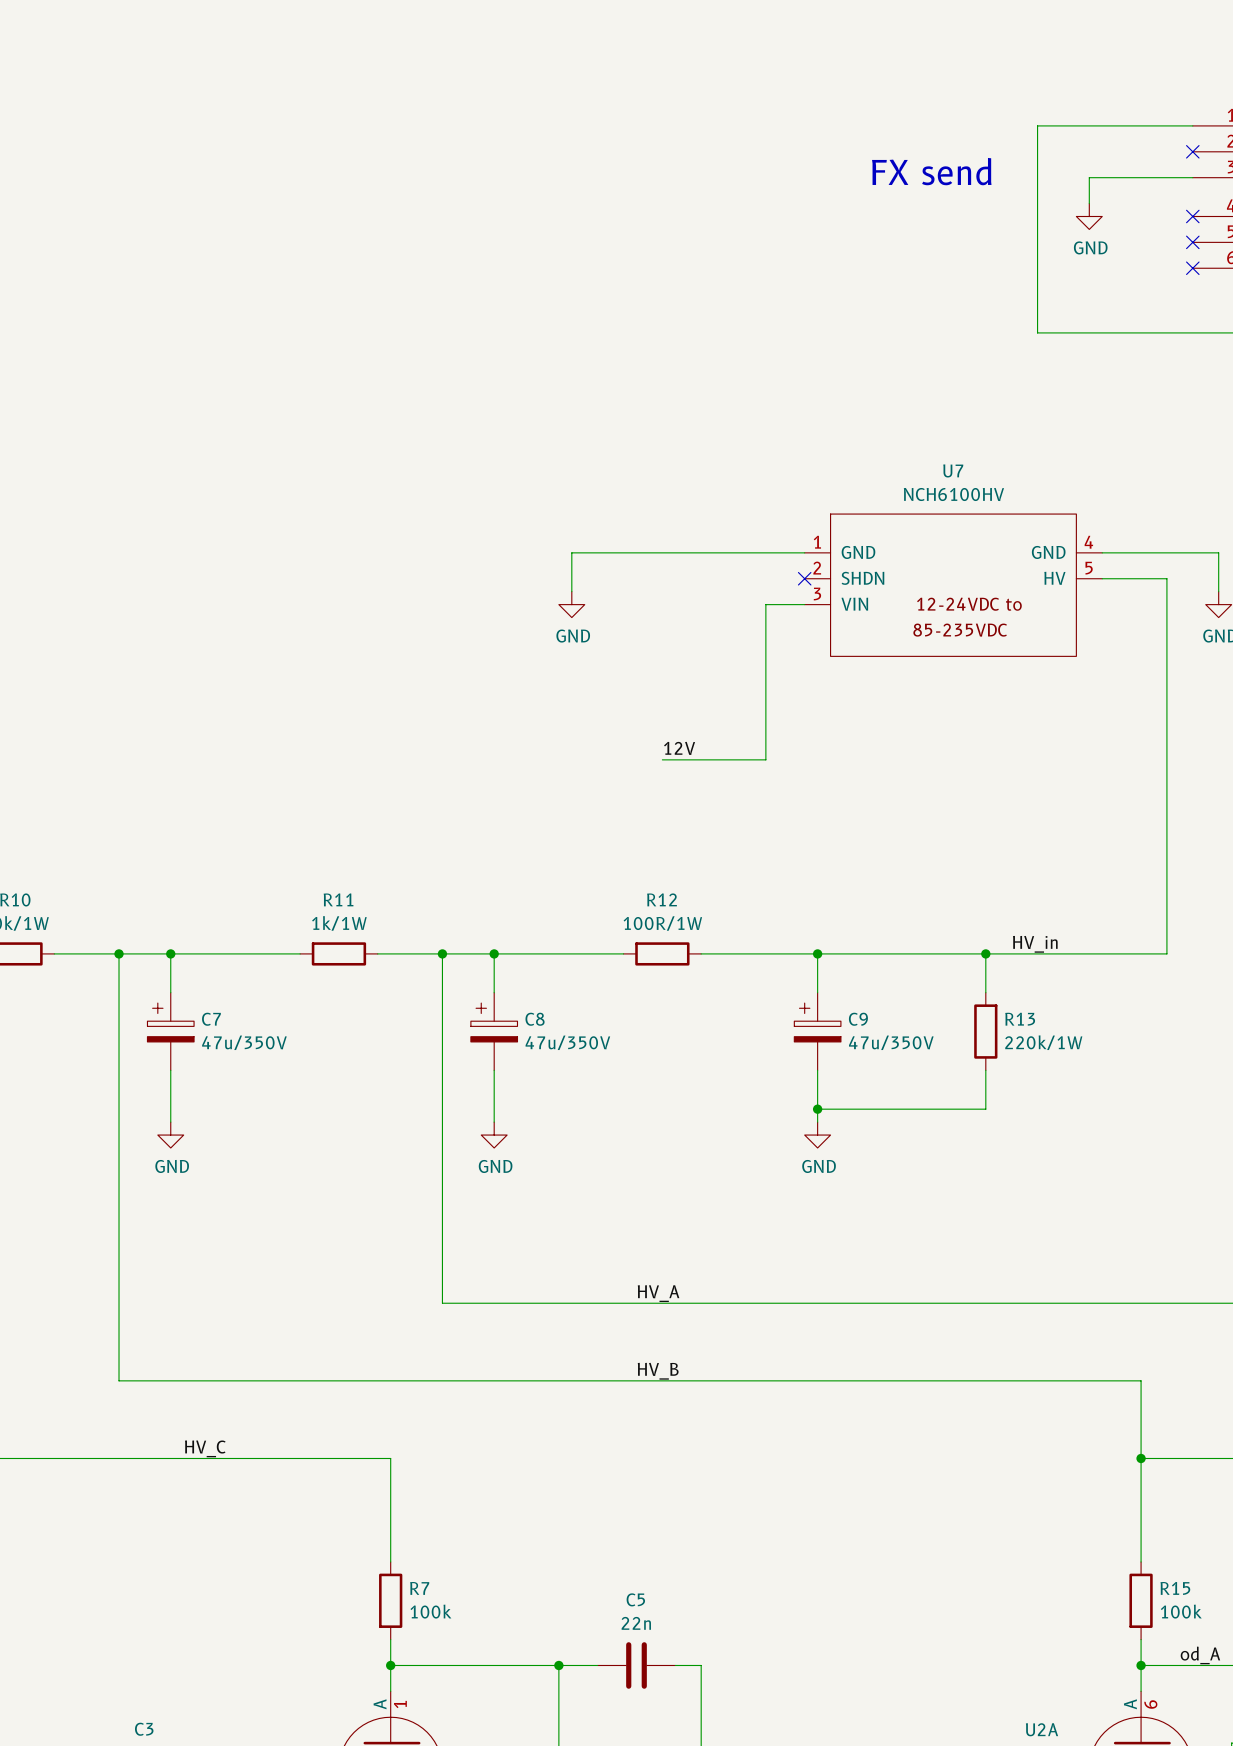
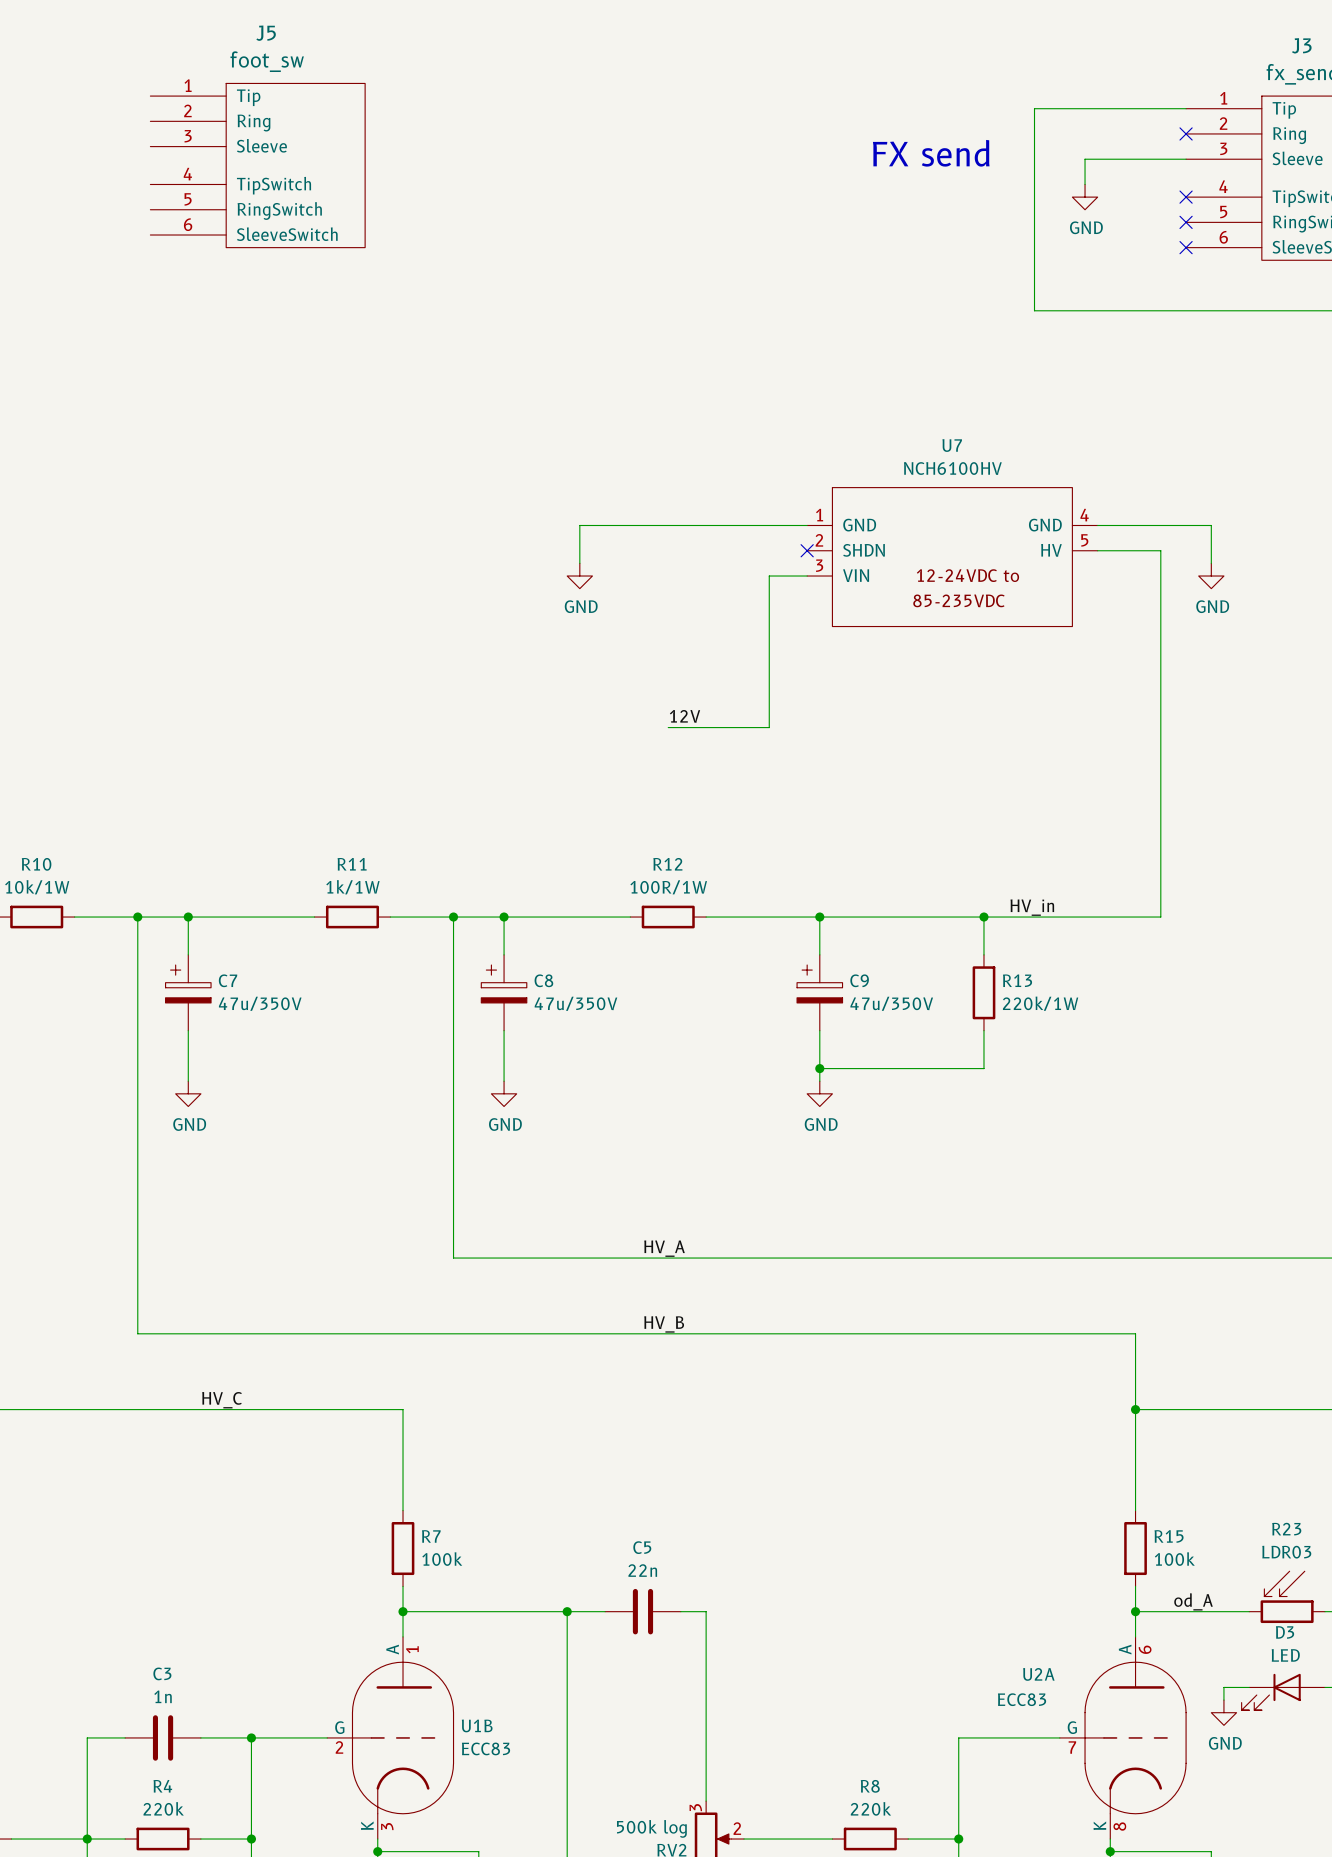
J5: none -> foot_sw (257, 165)

